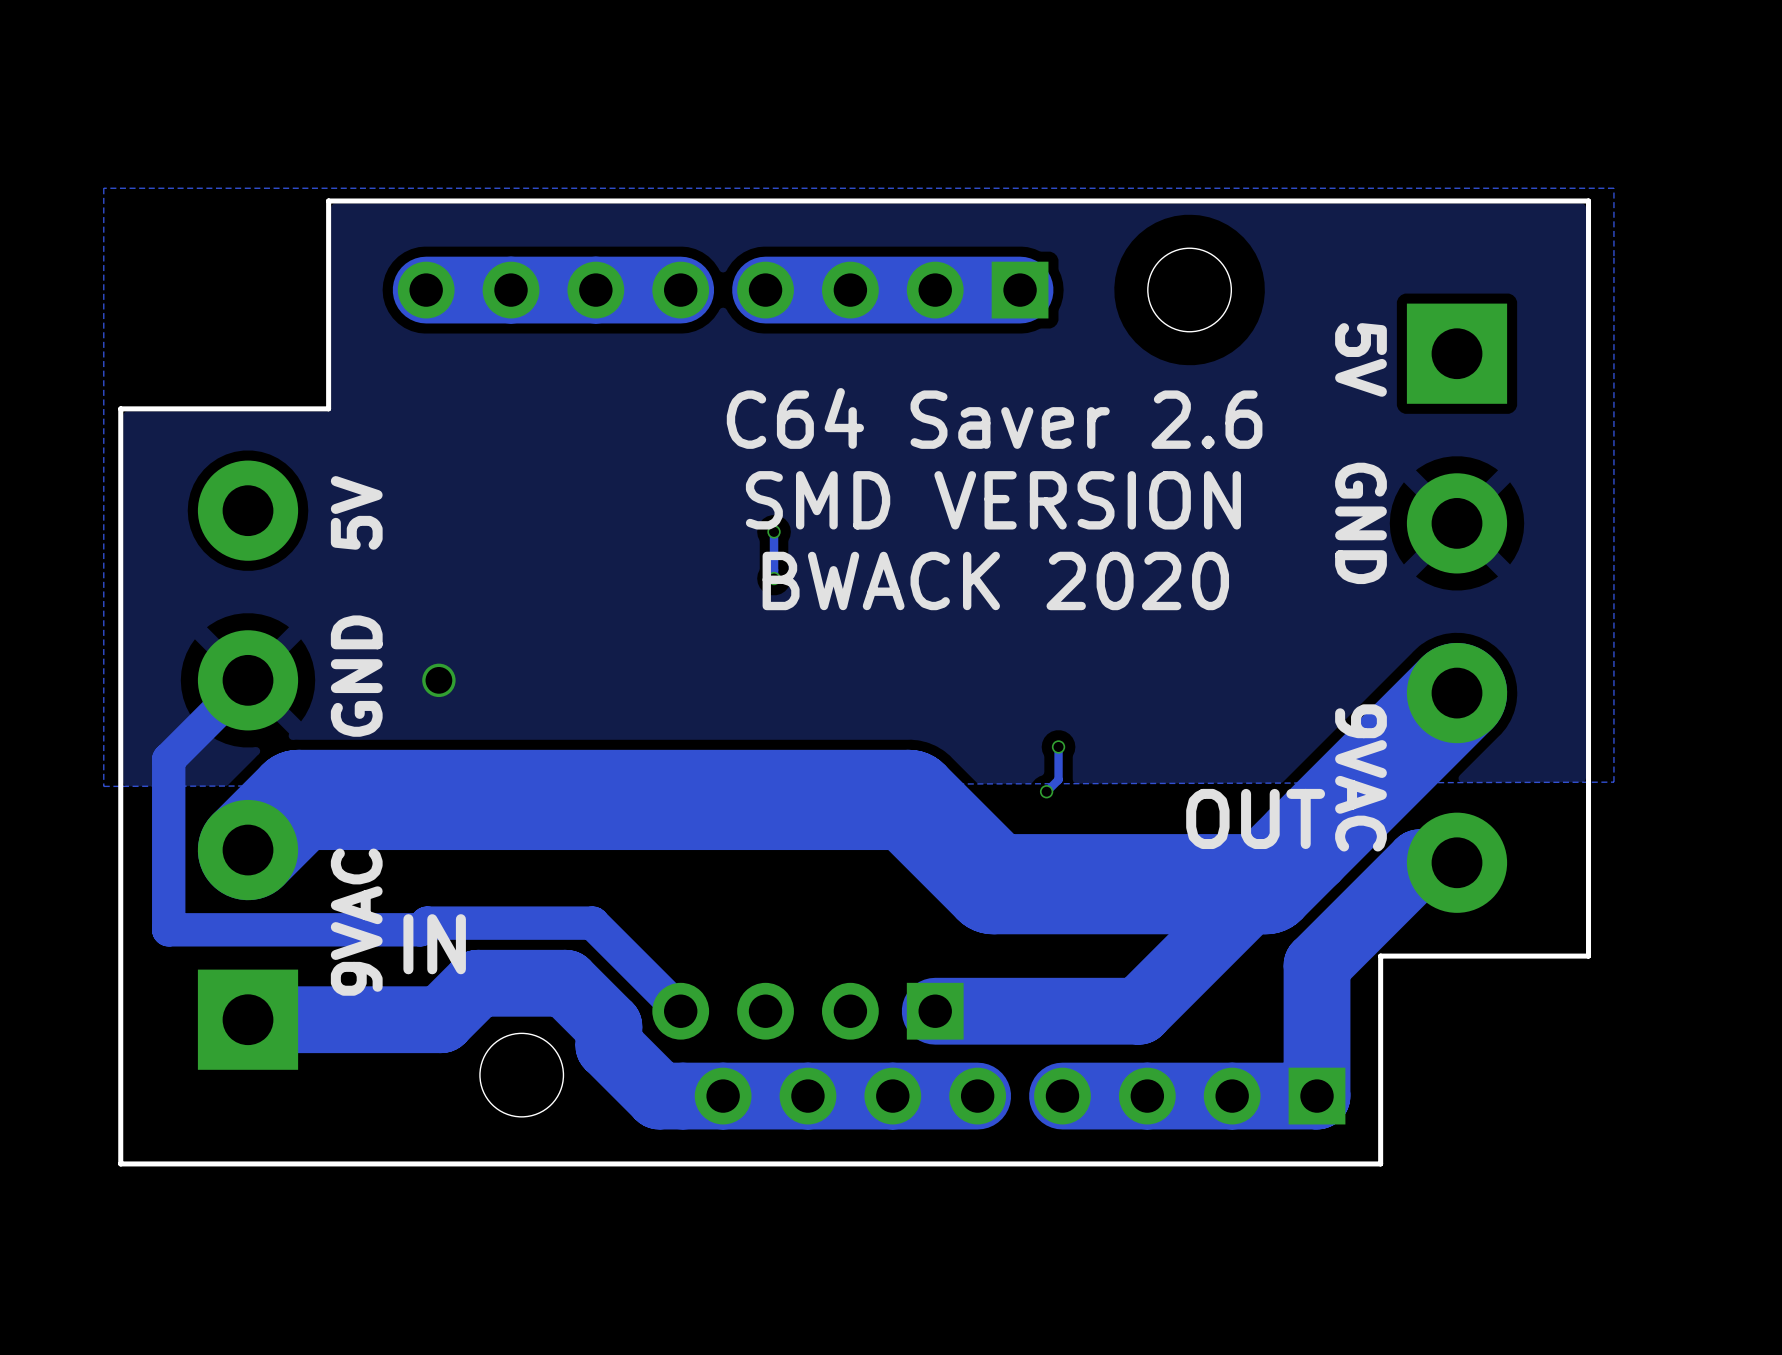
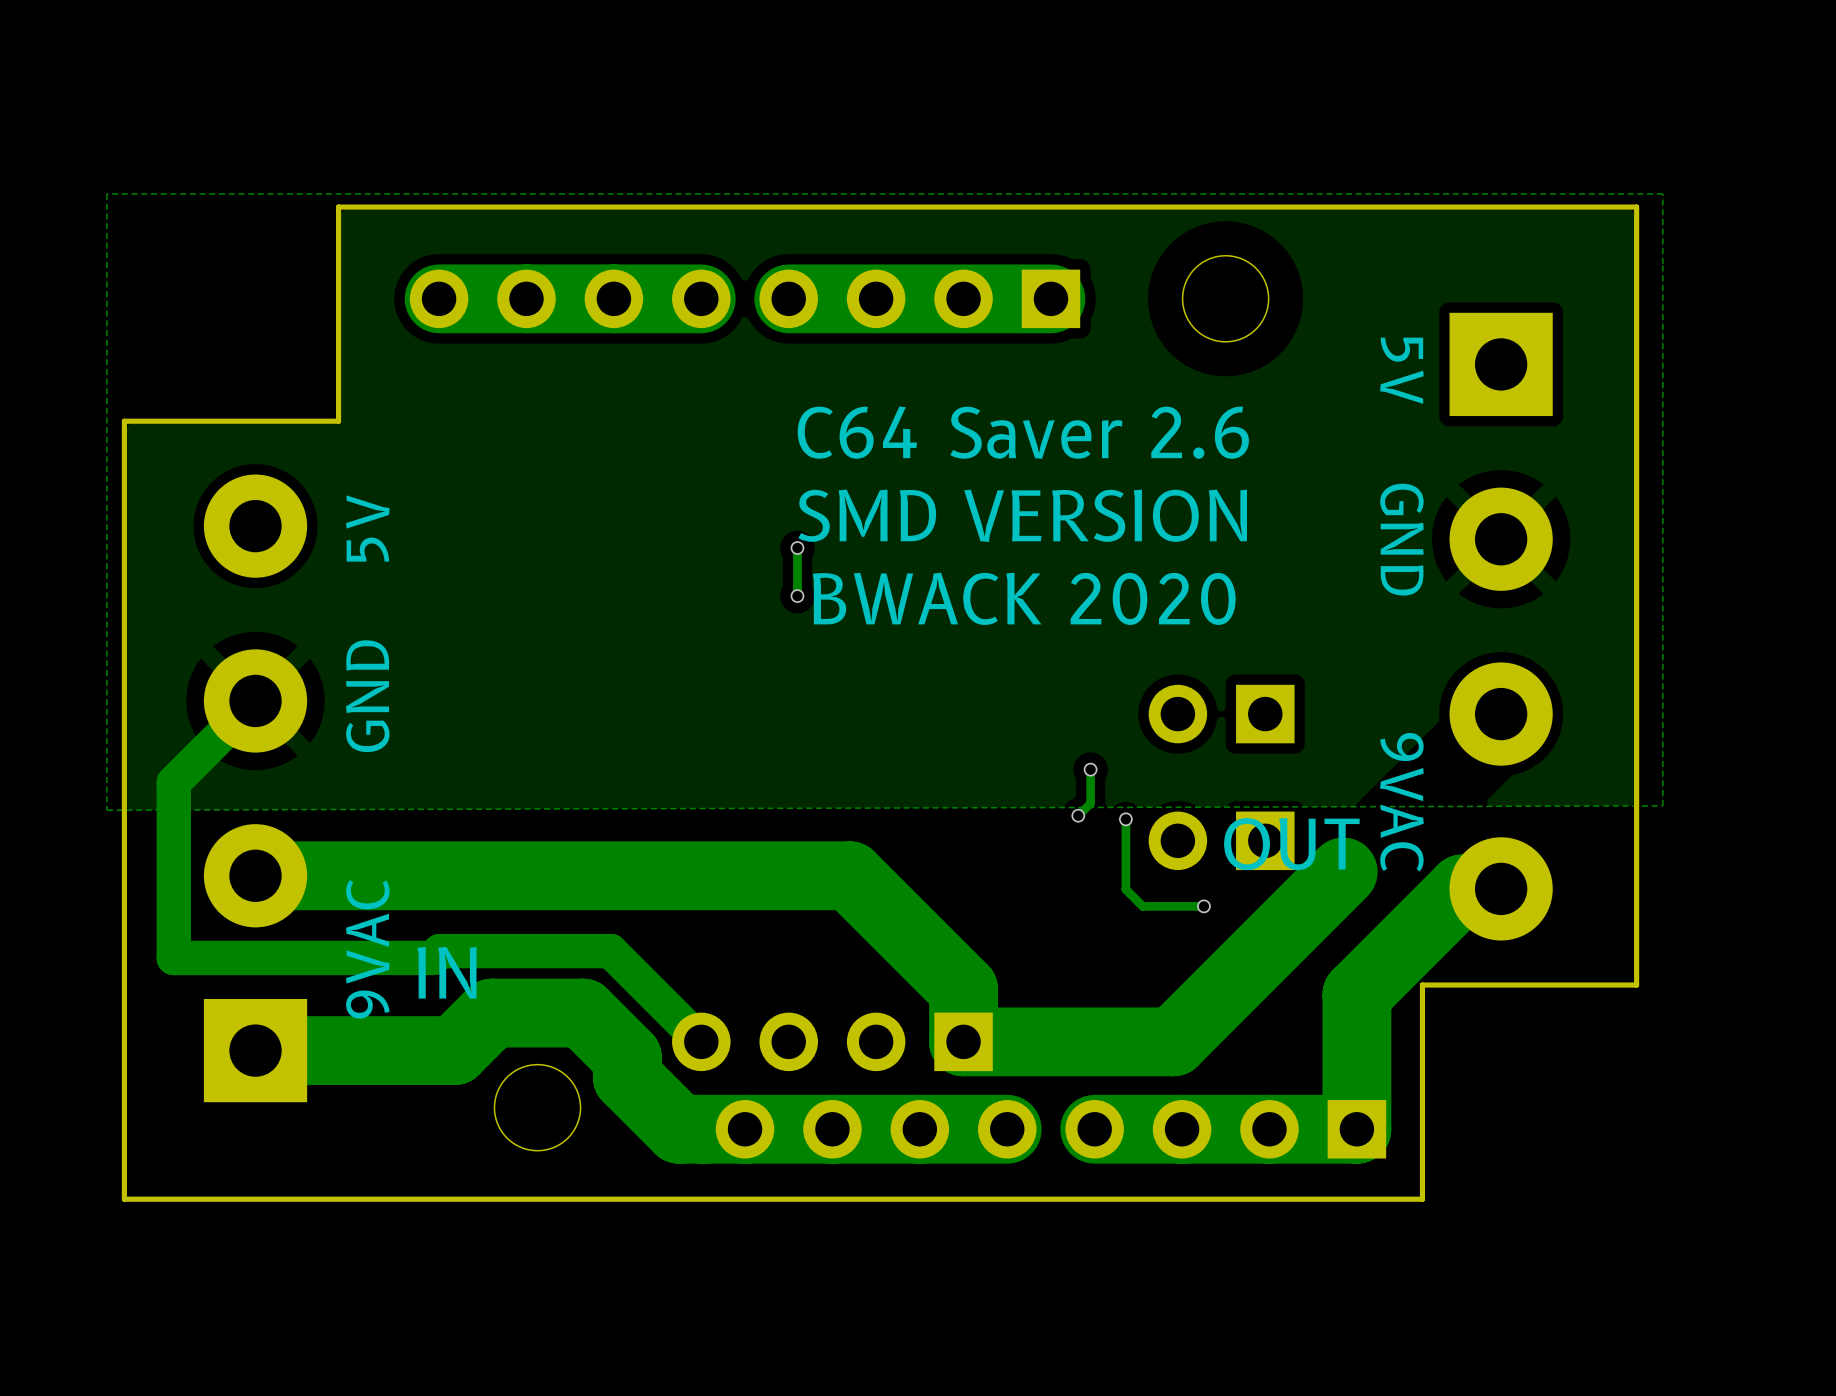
via: (438, 680) -> none
part: none -> (1221, 714)
track: (1457, 693) (1265, 884) (993, 884) (909, 799) (298, 799) (248, 850) -> (963, 1041) (963, 989) (849, 875) (255, 875)
track: none -> (1125, 819) (1125, 889) (1142, 906) (1203, 906)
via: none -> (1125, 819)
part: none -> (1221, 840)
via: none -> (1203, 906)

